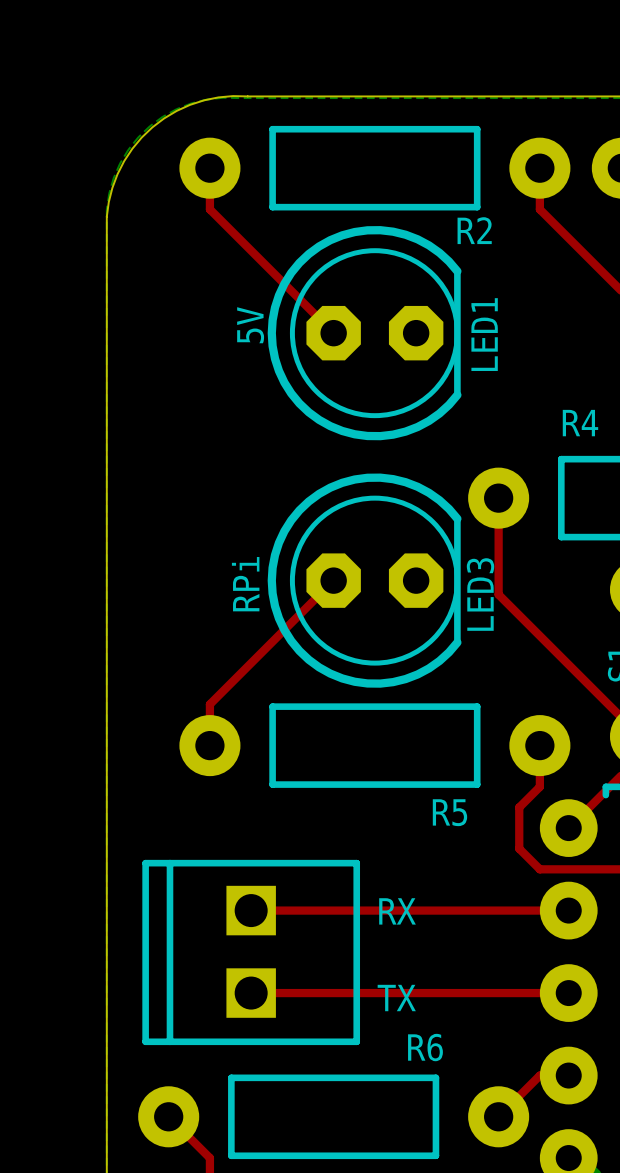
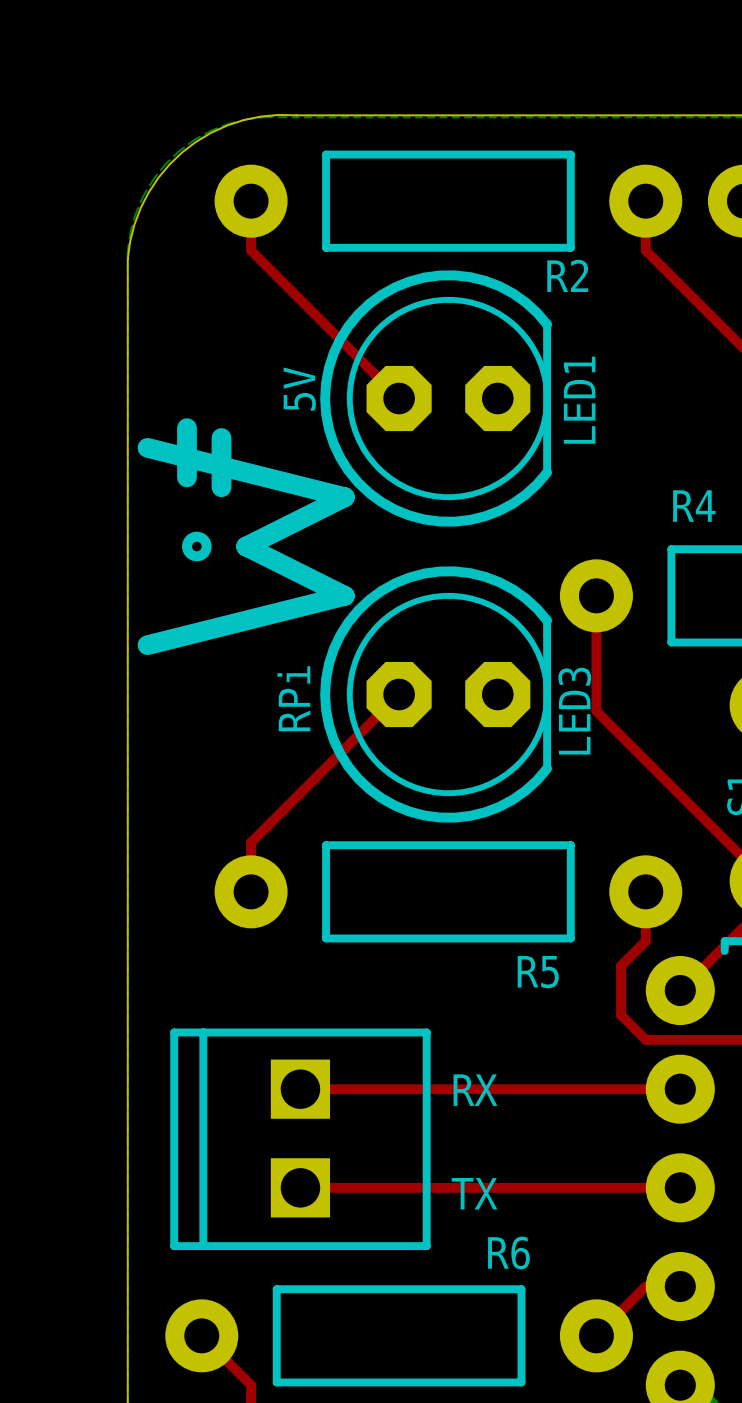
line: none -> (186, 428) (186, 477)
line: none -> (221, 437) (221, 487)
line: none -> (147, 447) (344, 497) (246, 546) (344, 595) (147, 645)
drawing: none -> [182, 531, 212, 562]

